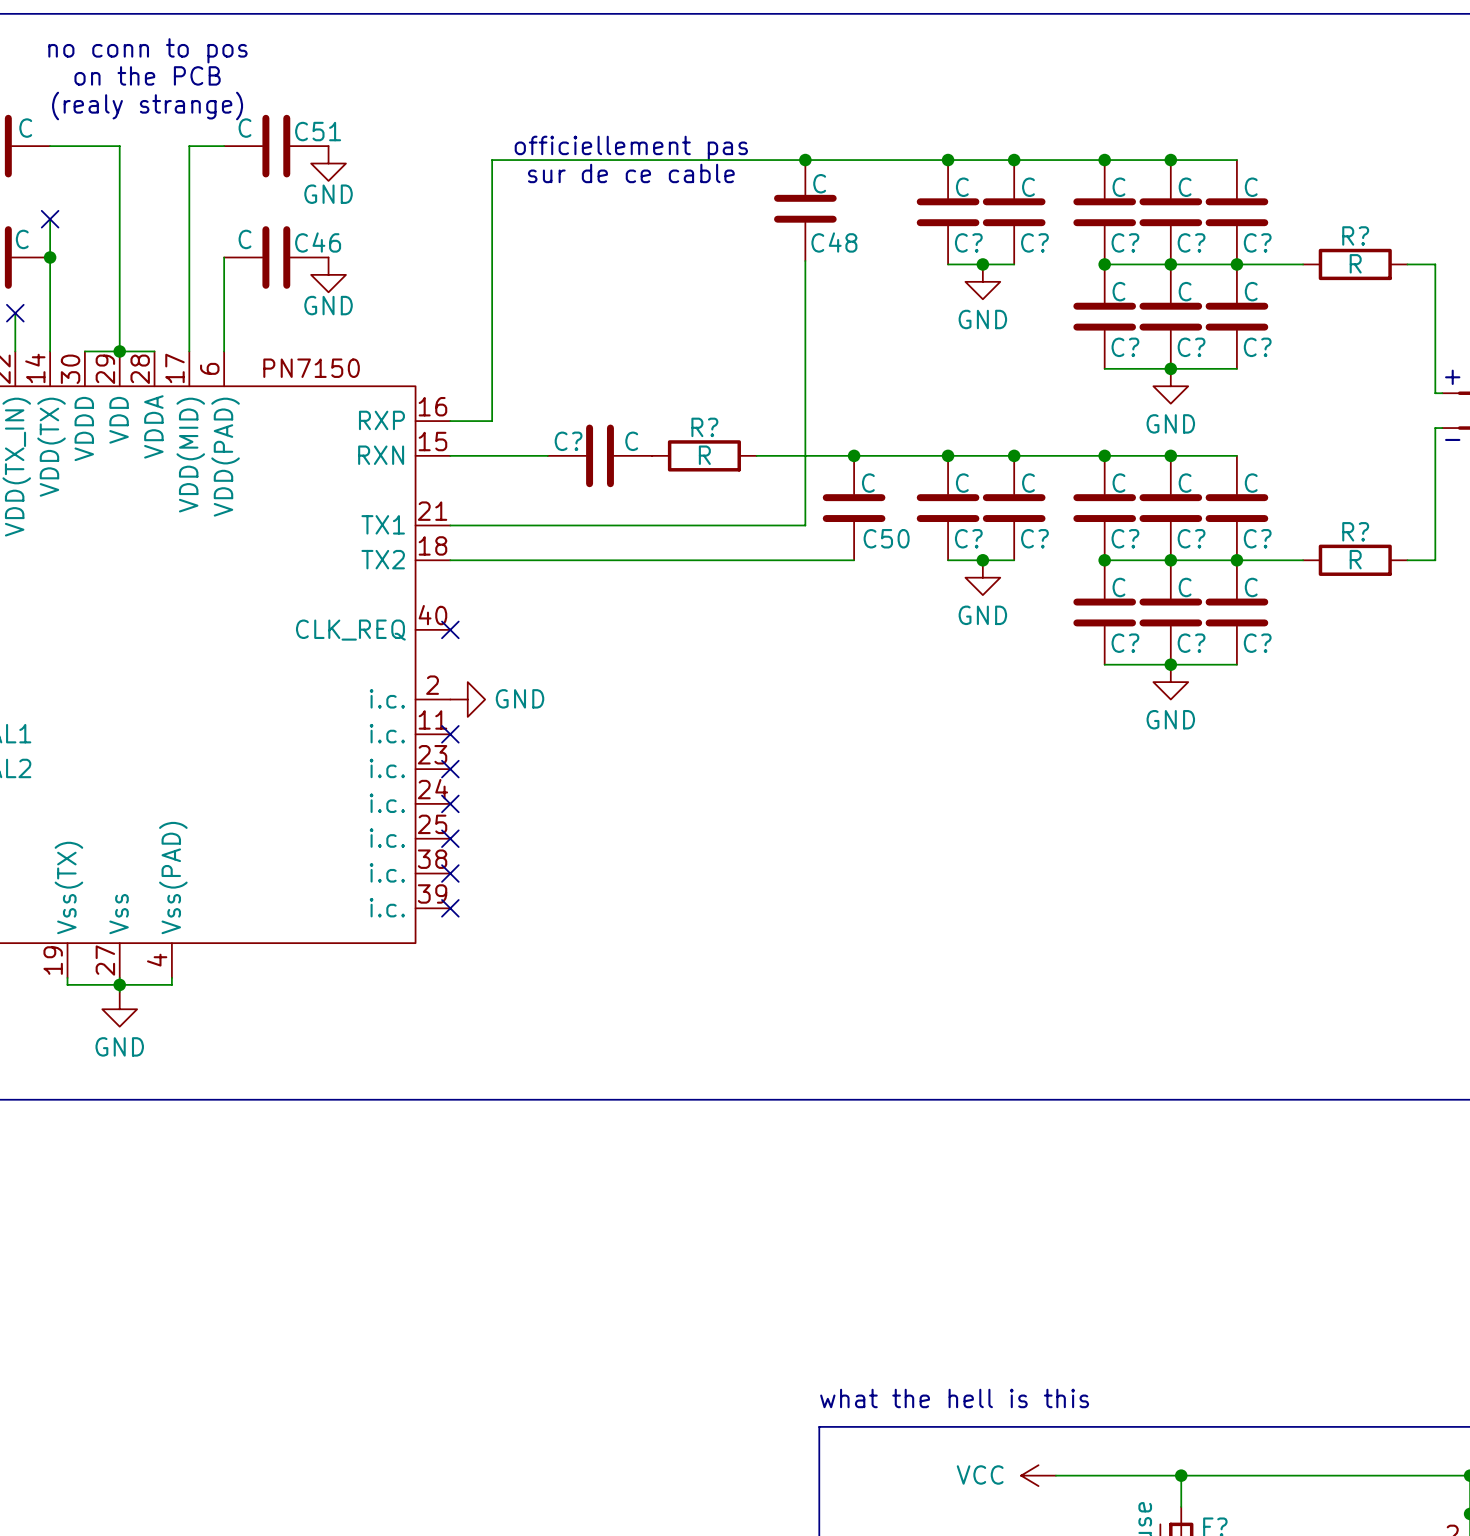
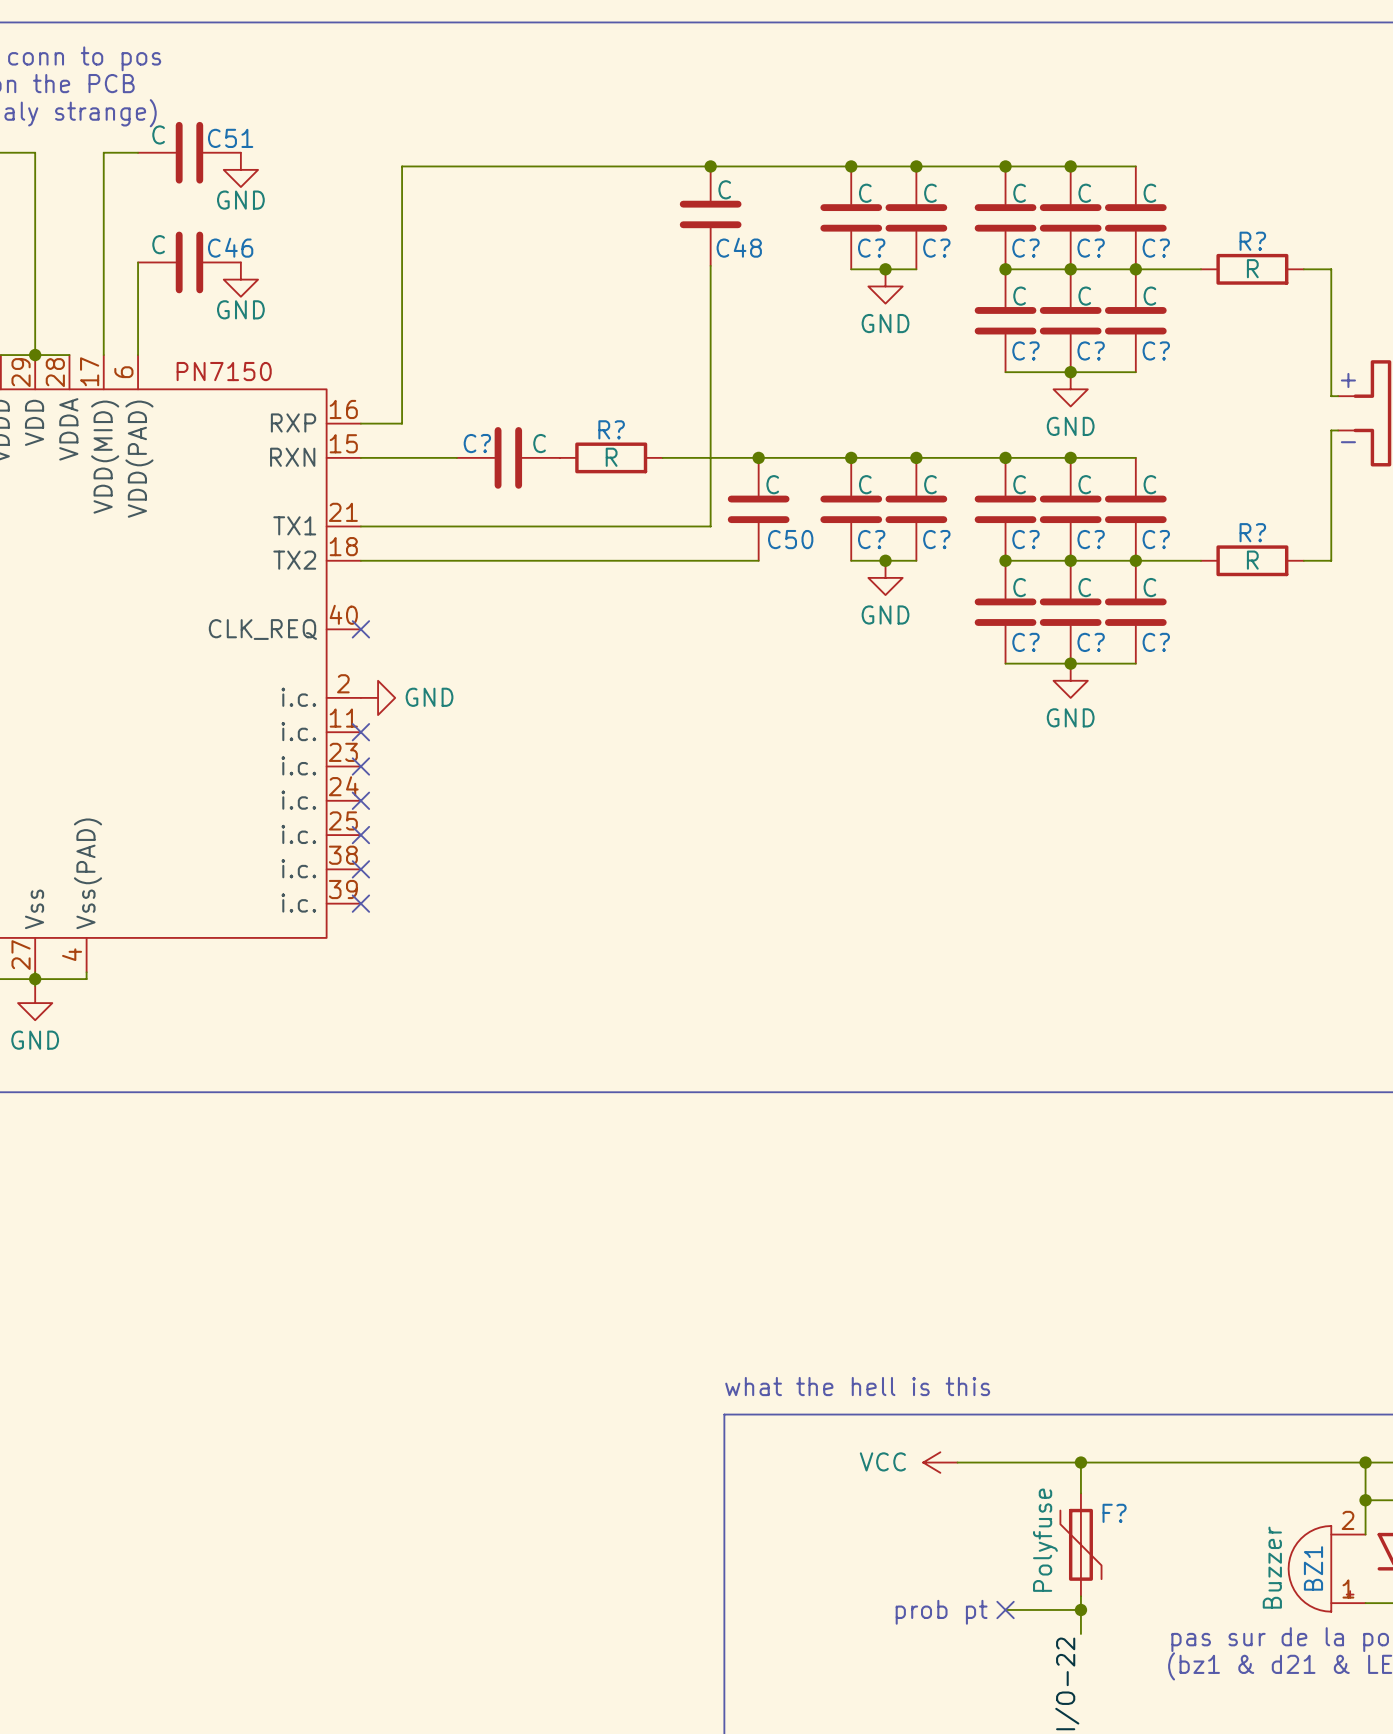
text: officiellement pas (631, 148) -> none
text: sur de ce cable (631, 173) -> none

